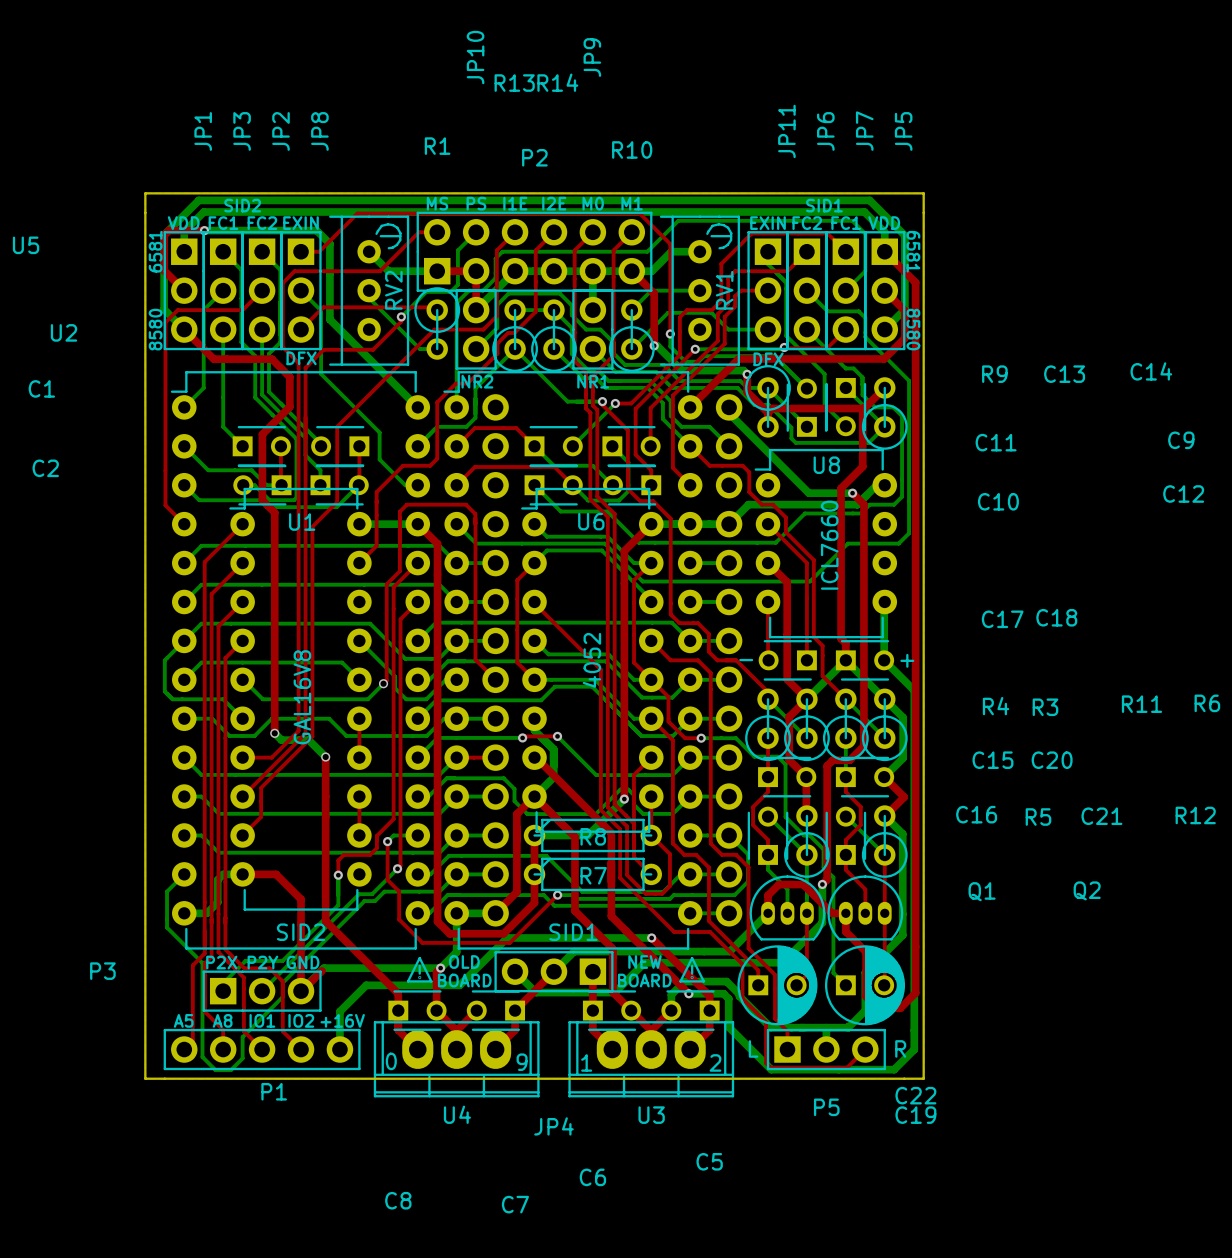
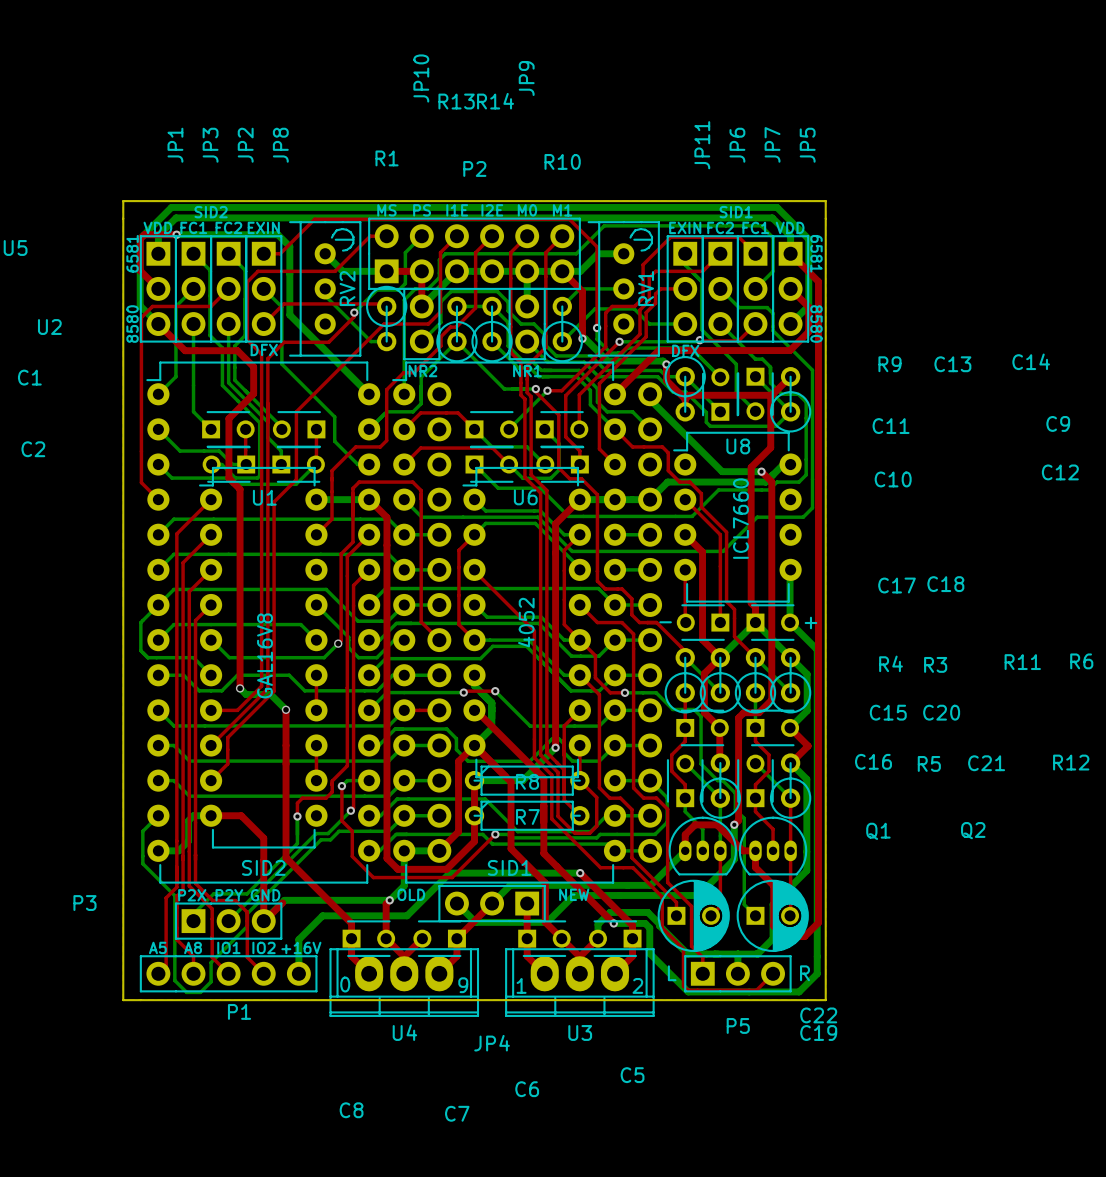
drawing: [406, 956, 433, 983] -> none
drawing: [679, 956, 705, 983] -> none
text: BOARD (464, 980) -> none
text: BOARD (644, 980) -> none

